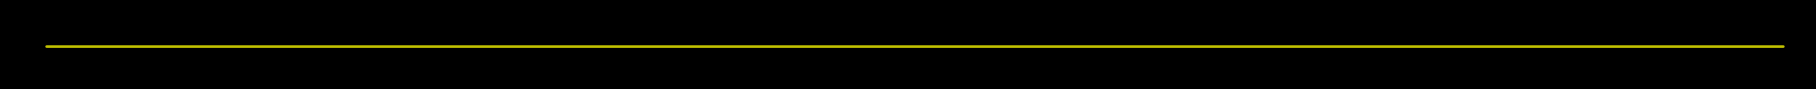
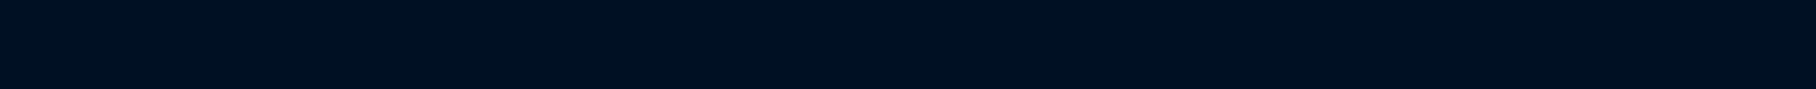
board edge: (46, 46) (1783, 46) -> none

